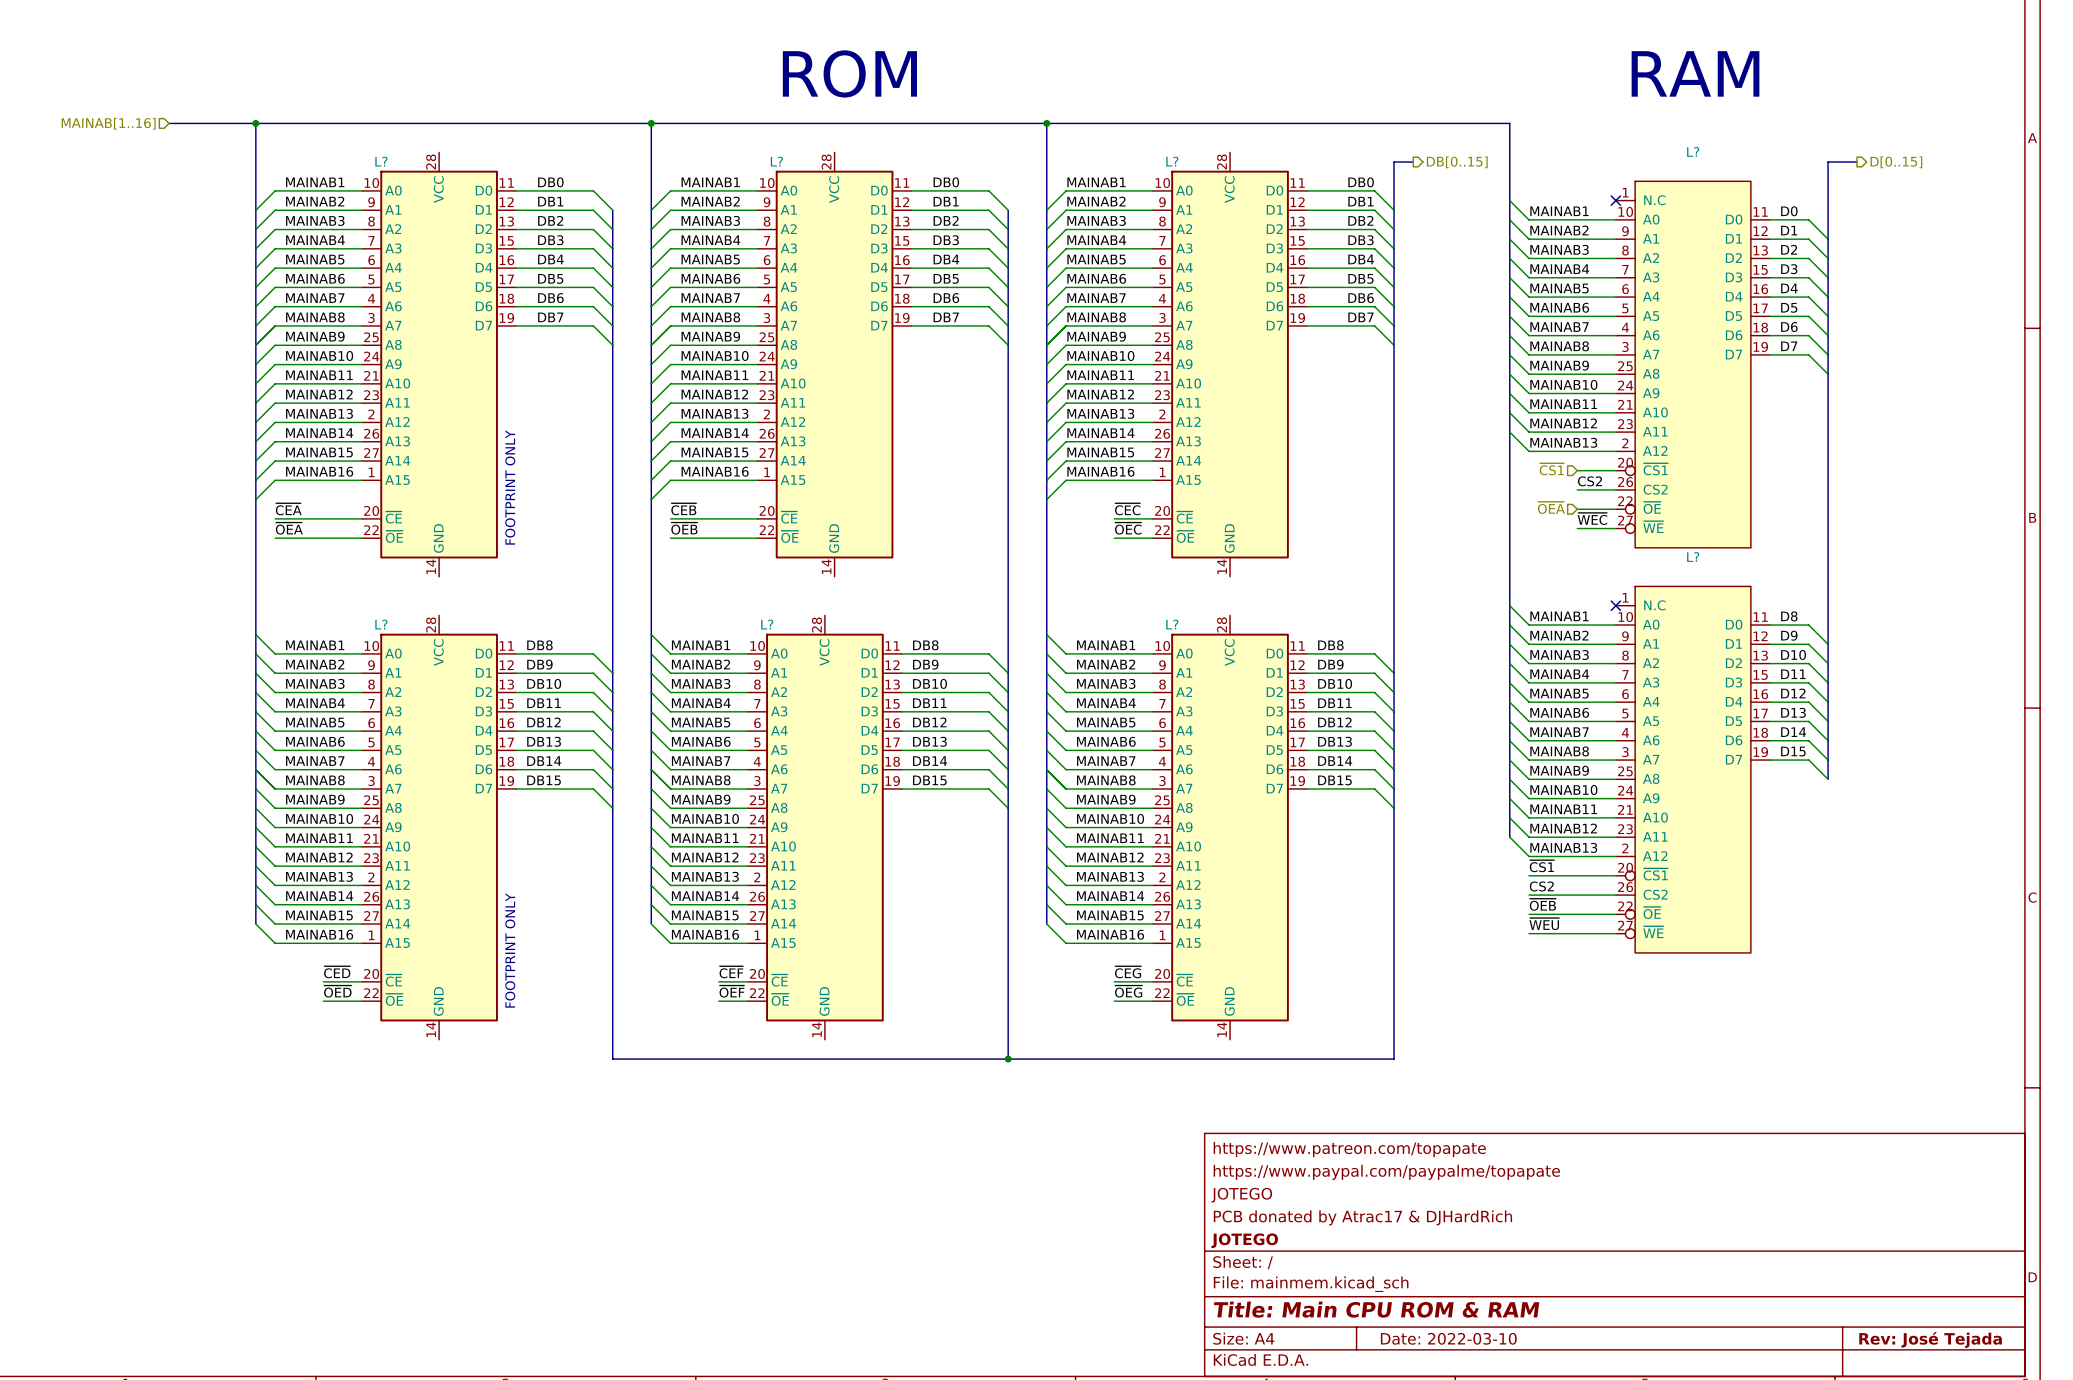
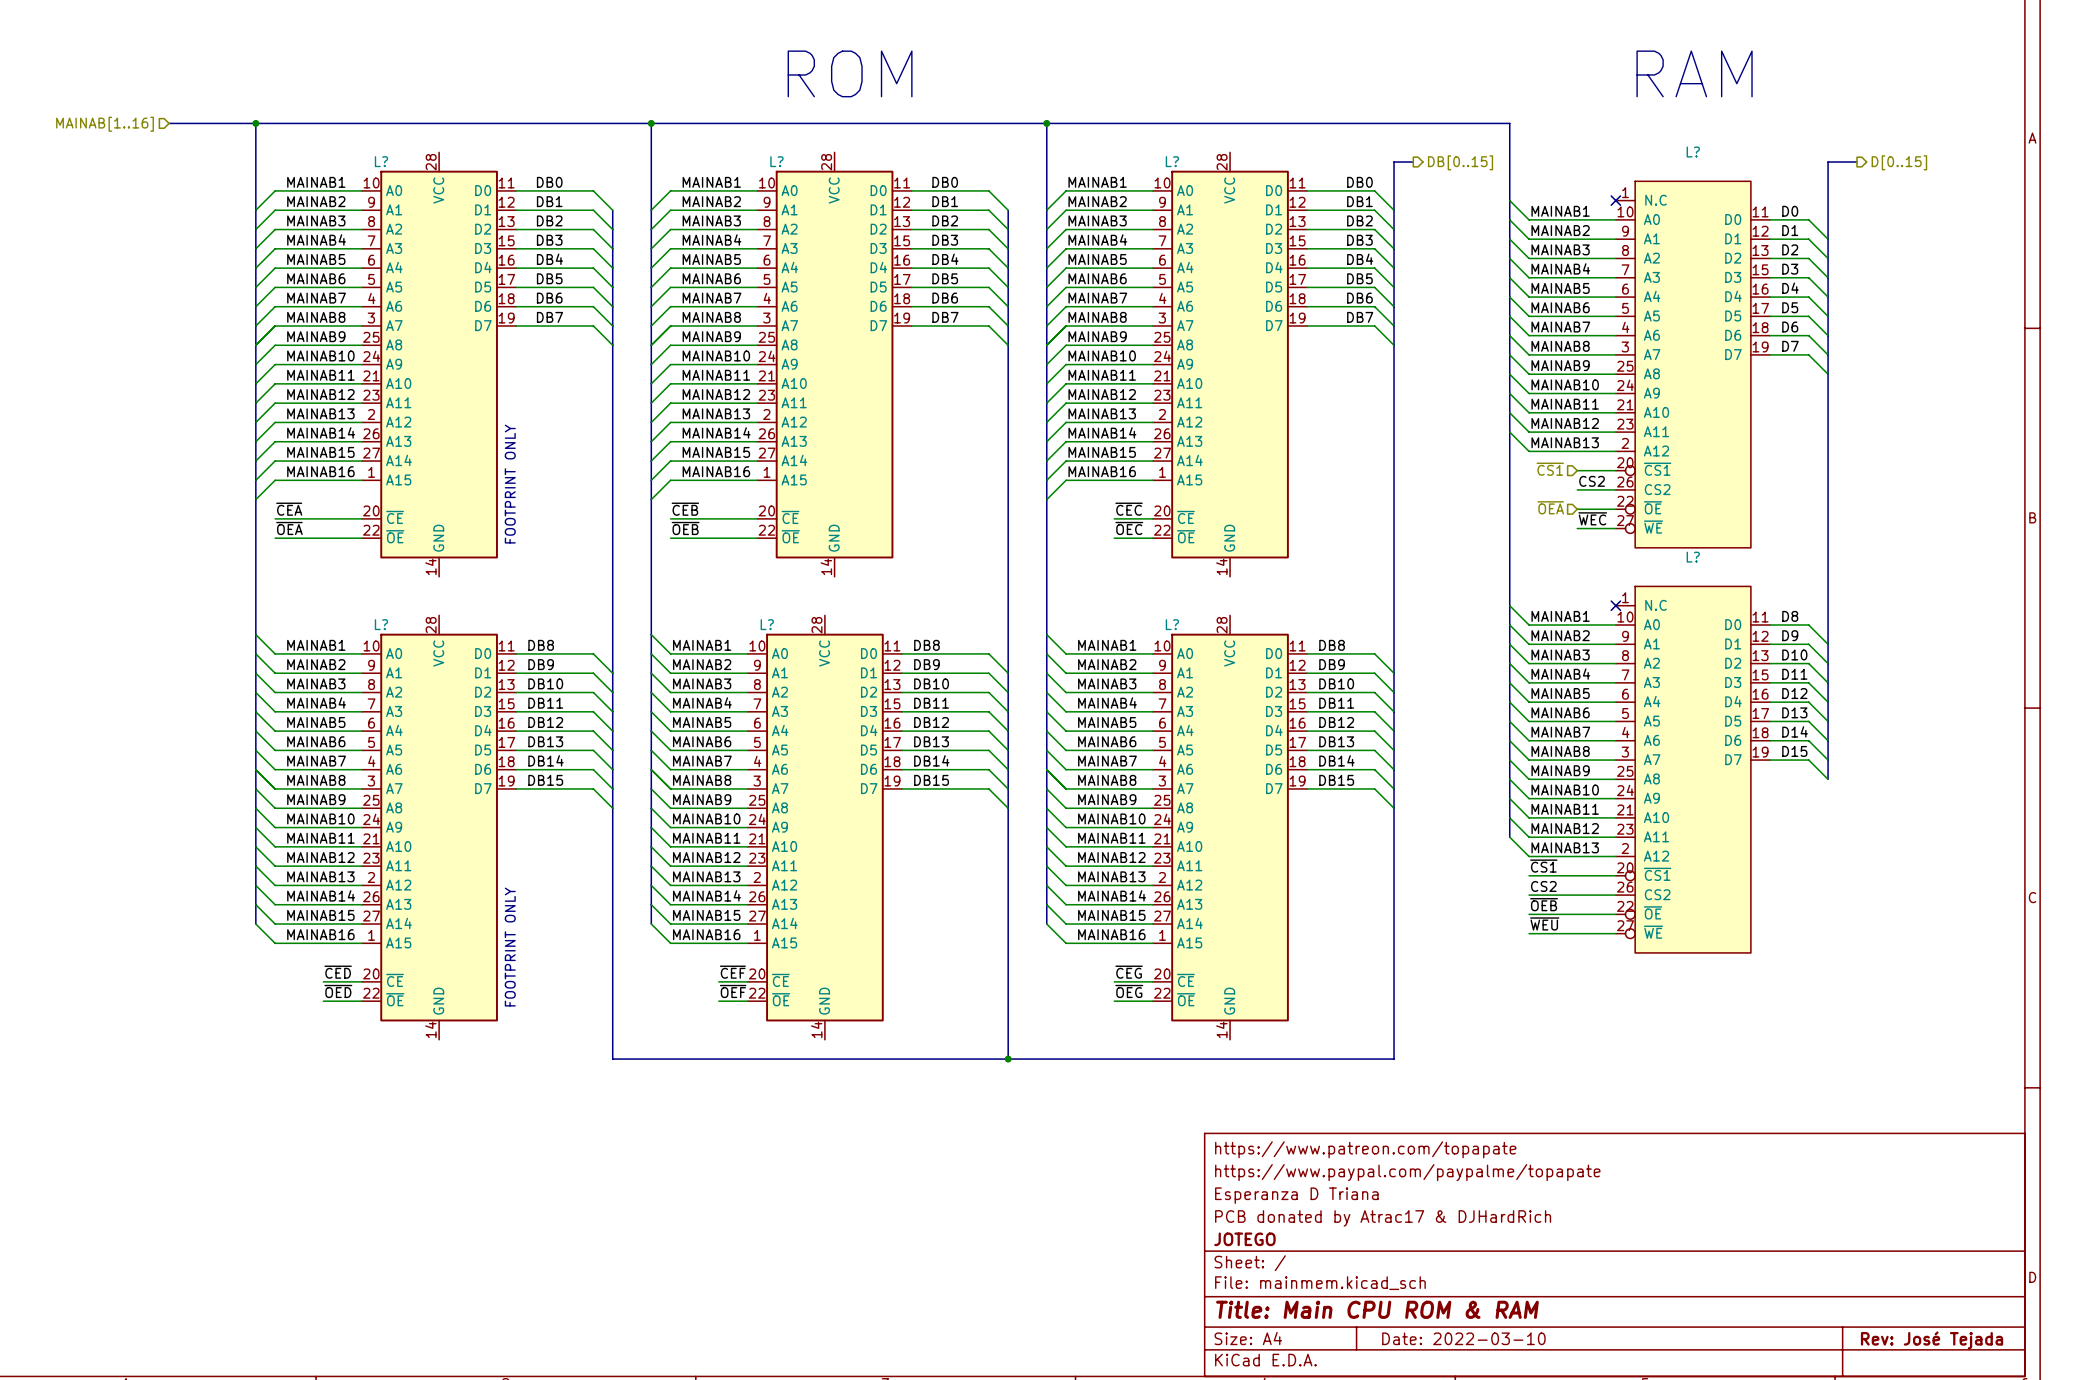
title block: JOTEGO (1241, 1195) -> Esperanza D Triana (1296, 1195)

